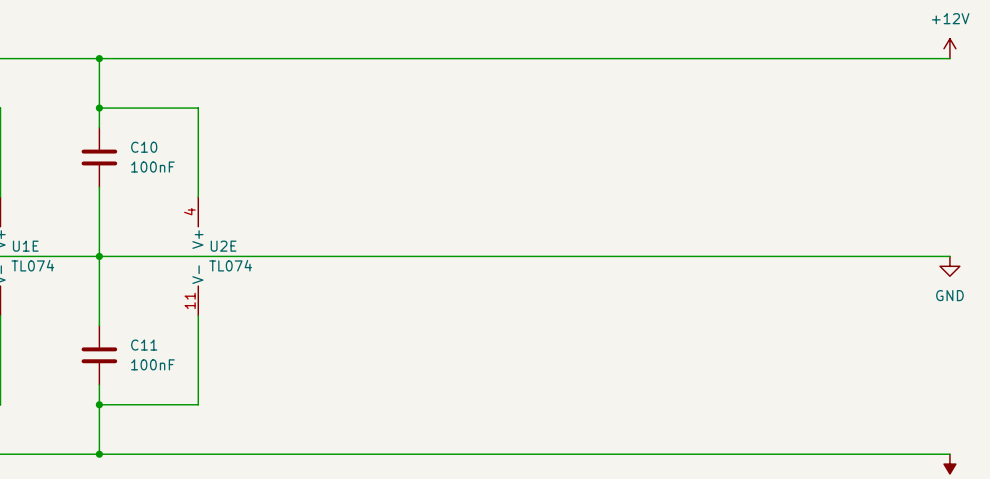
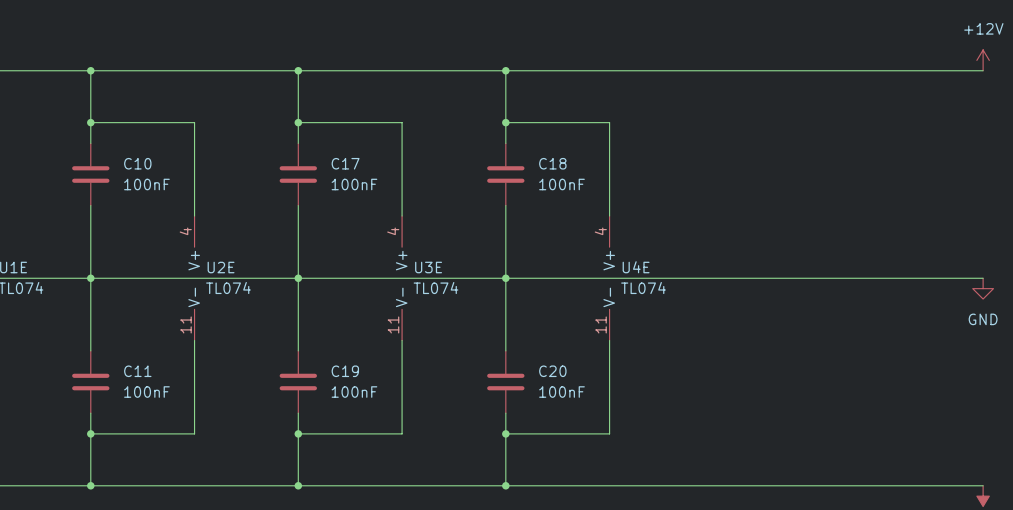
wire: none -> (298, 70) (298, 143)
junction: none -> (298, 70)
wire: none -> (505, 70) (505, 143)
junction: none -> (505, 70)
wire: none -> (298, 122) (402, 122) (402, 216)
junction: none -> (298, 122)
wire: none -> (505, 122) (609, 122) (609, 216)
junction: none -> (505, 122)
C17: none -> 100nF (298, 174)
C18: none -> 100nF (505, 174)
wire: none -> (298, 205) (298, 350)
wire: none -> (505, 205) (505, 350)
junction: none -> (298, 278)
U3E: none -> TL074 (402, 278)
junction: none -> (505, 278)
U4E: none -> TL074 (609, 278)
wire: none -> (402, 340) (402, 433) (298, 433)
wire: none -> (609, 340) (609, 433) (505, 433)
C19: none -> 100nF (298, 382)
C20: none -> 100nF (505, 382)
wire: none -> (298, 413) (298, 485)
wire: none -> (505, 413) (505, 485)
junction: none -> (298, 433)
junction: none -> (505, 433)
junction: none -> (298, 485)
junction: none -> (505, 485)

